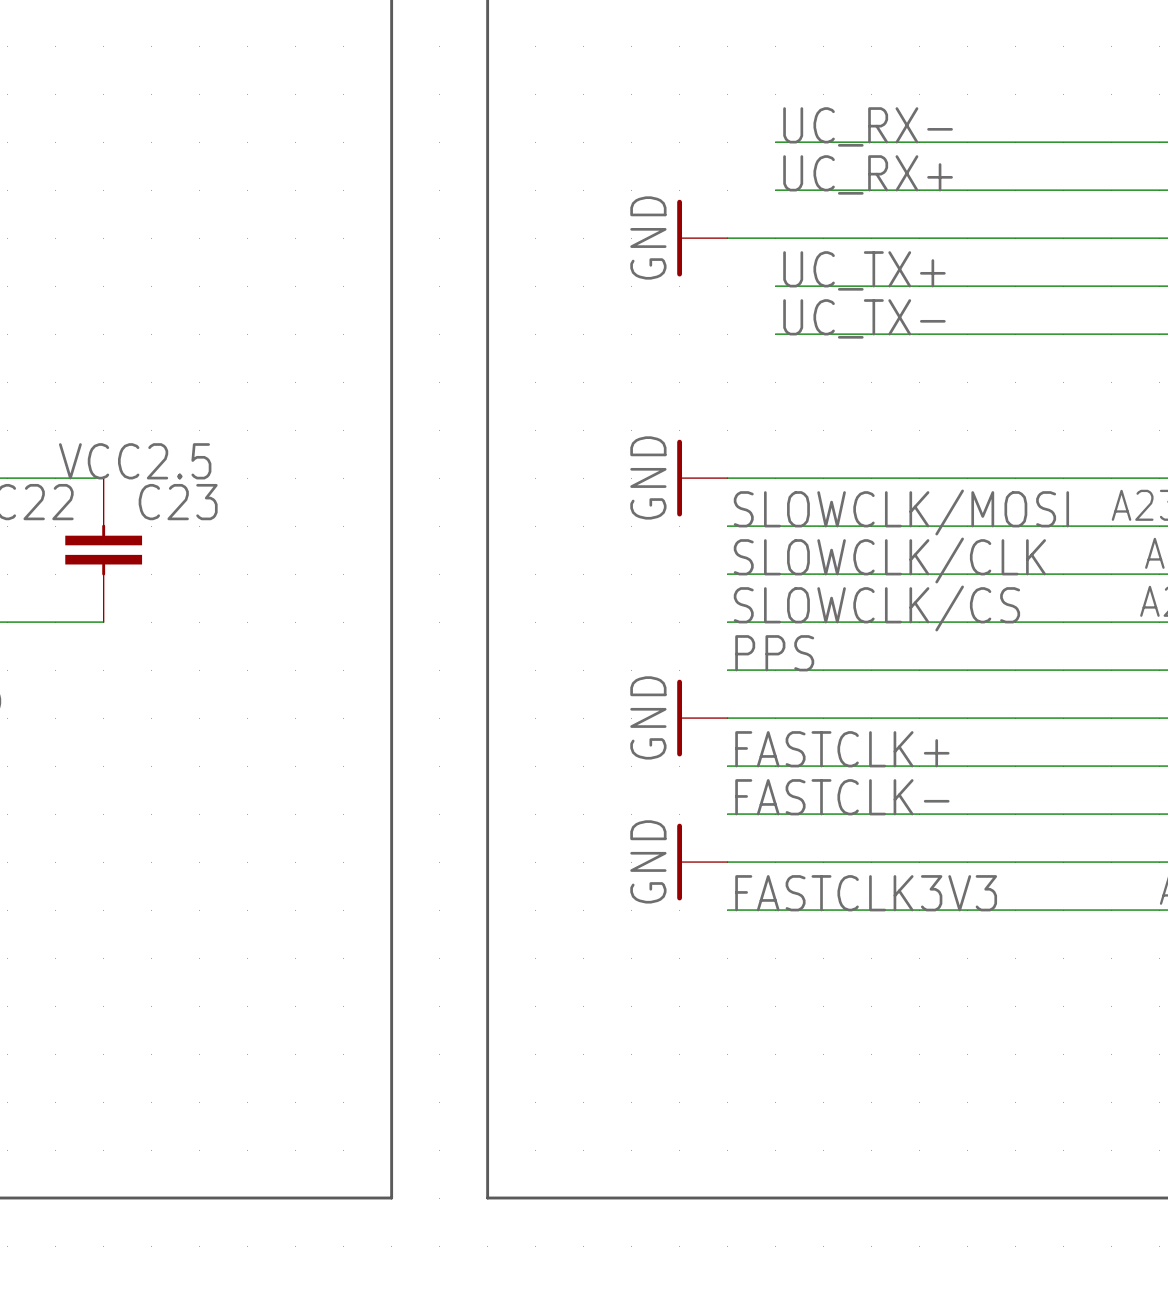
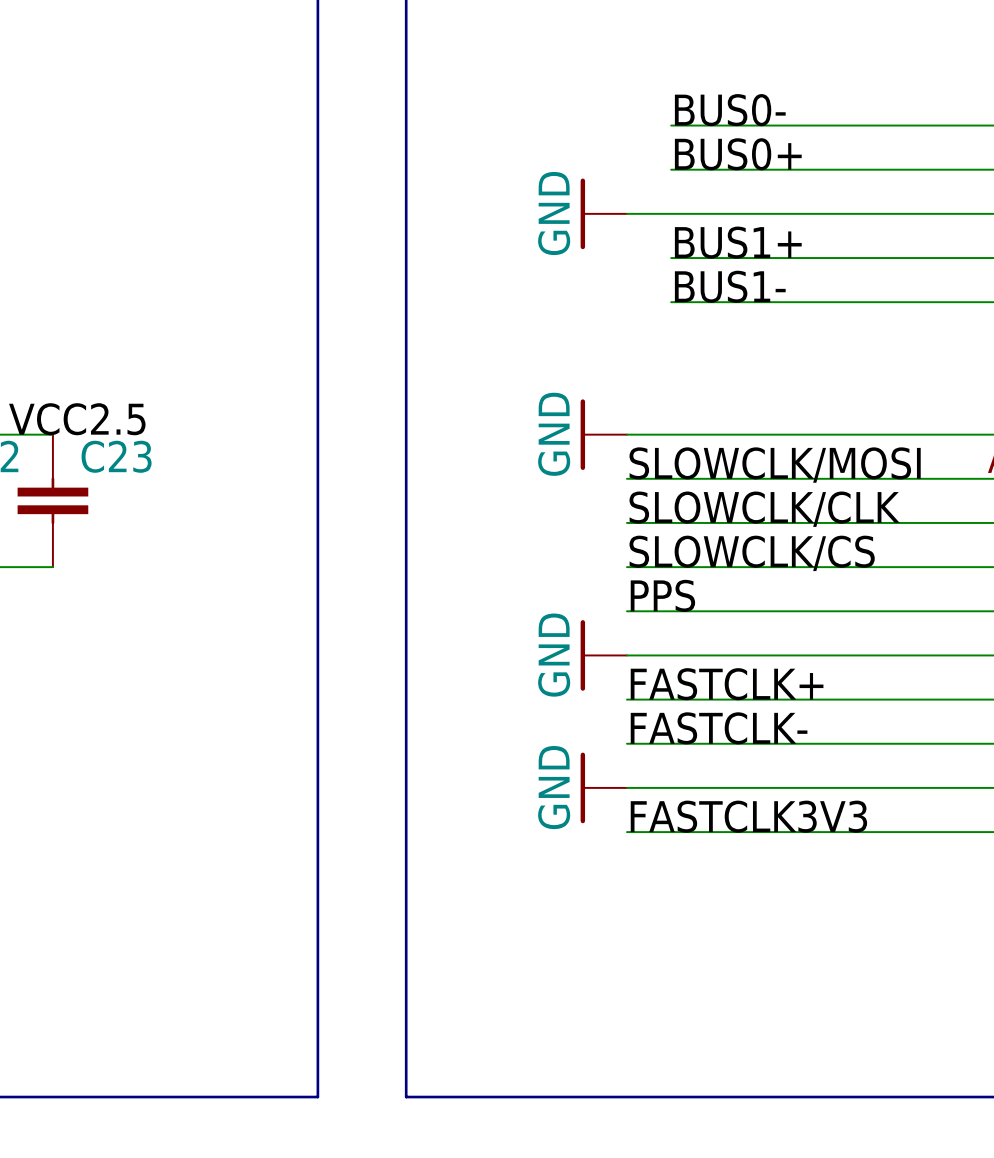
label: UC_RX- (868, 126) -> BUS0- (730, 110)
label: UC_RX+ (868, 174) -> BUS0+ (738, 154)
label: UC_TX+ (864, 270) -> BUS1+ (738, 242)
label: UC_TX- (864, 318) -> BUS1- (730, 286)

